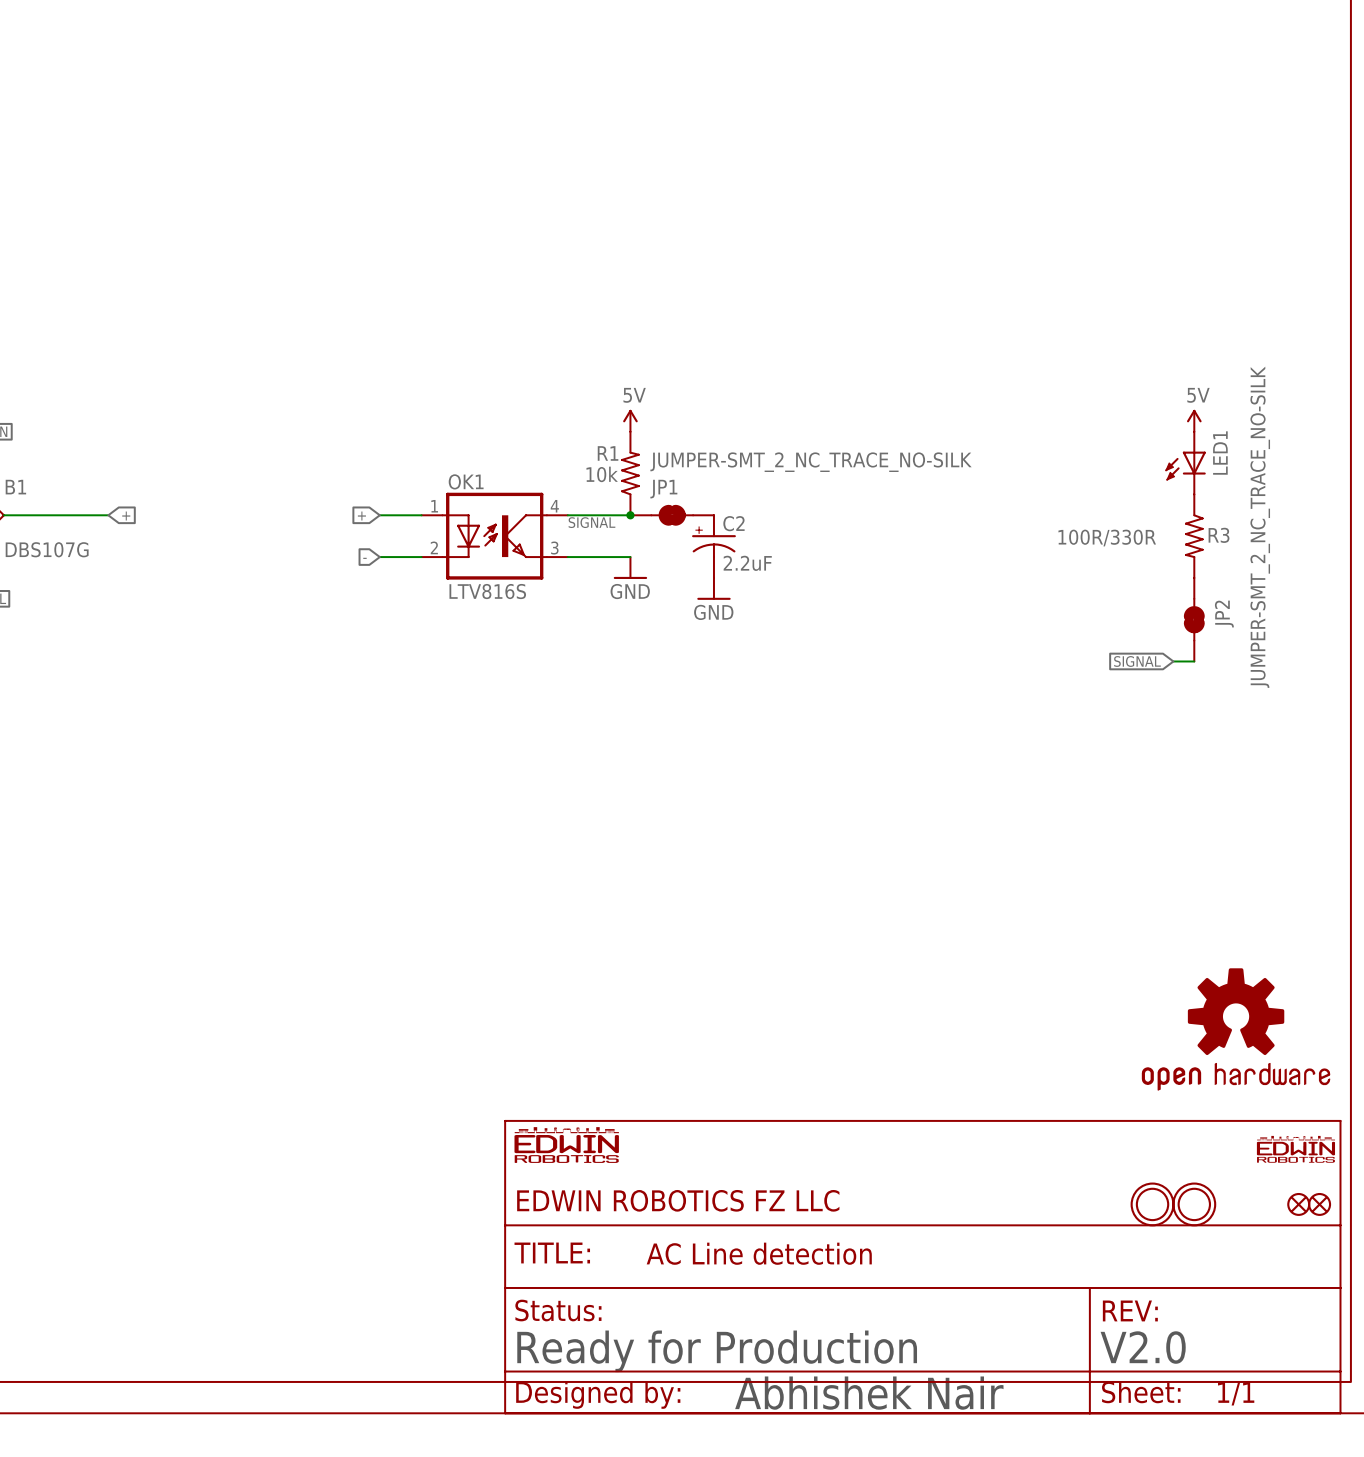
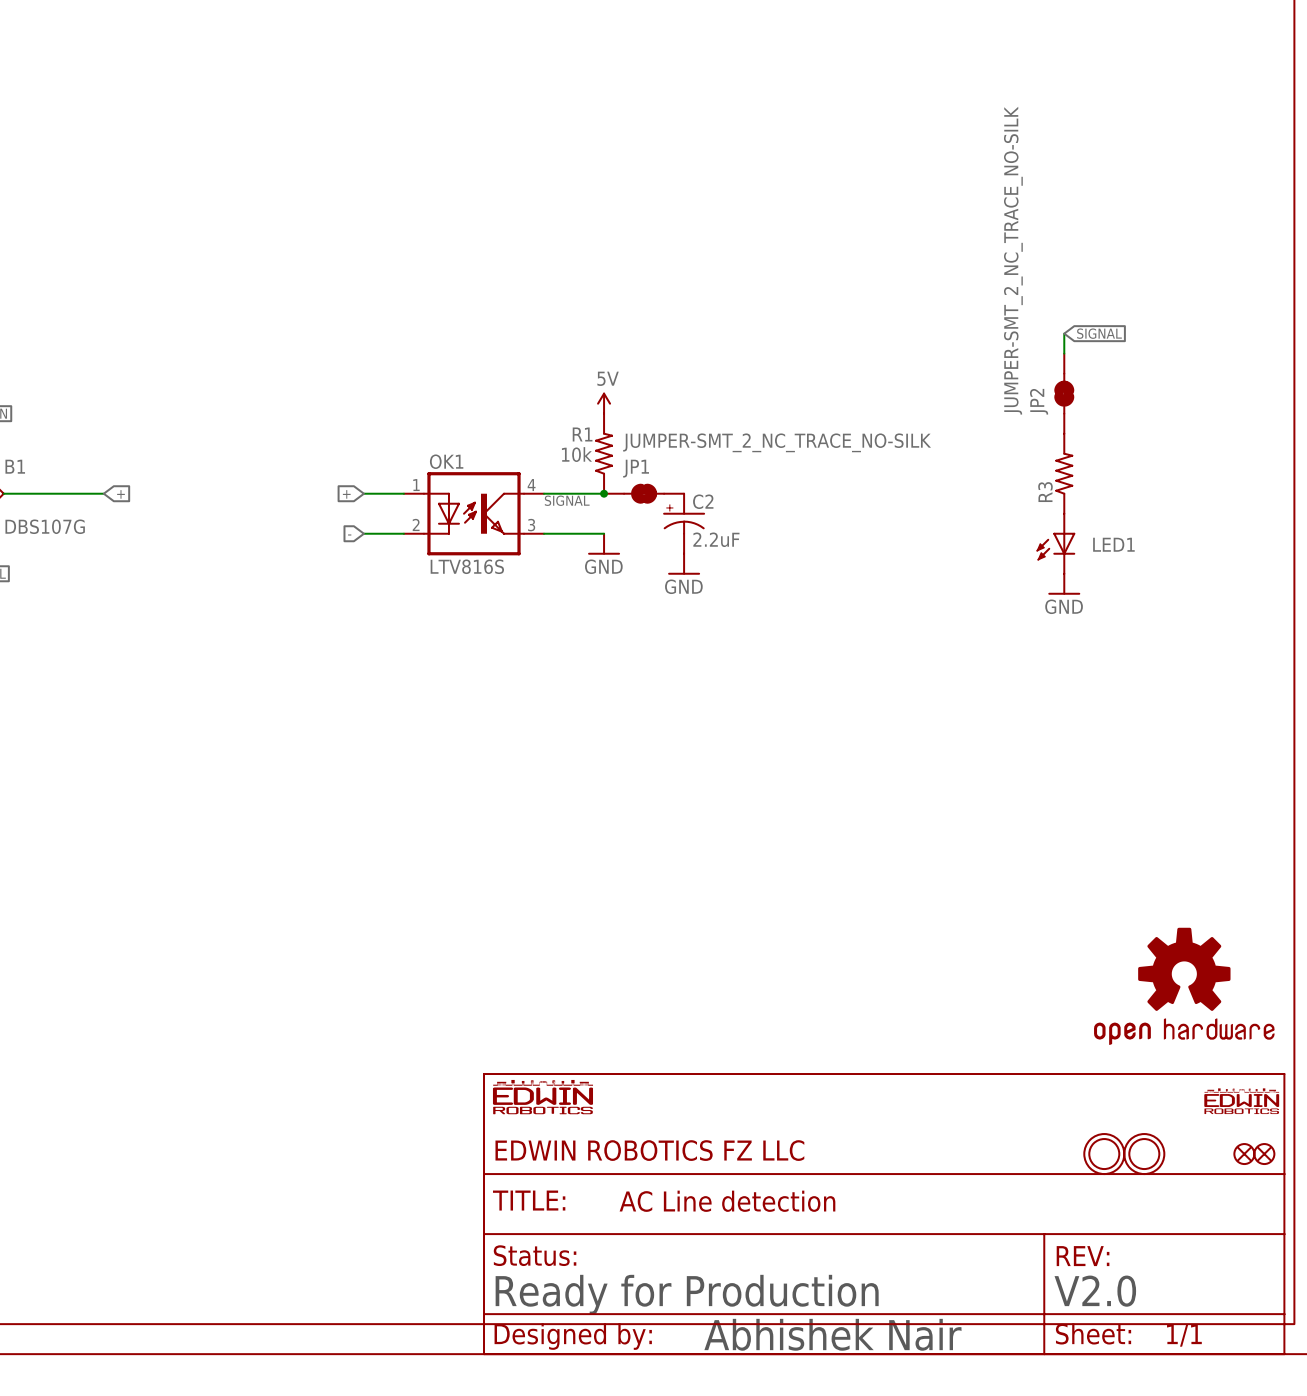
wire: none -> (1064, 333) (1064, 353)
global label: none -> SIGNAL (1099, 333)
power symbol: 5V (1194, 420) -> none
LED1 name rotation: 0° (1220, 453) -> 90° clockwise (1113, 544)
LED1 position: (1185, 463) -> (1055, 543)
JP2 value position: JUMPER-SMT_2_NC_TRACE_NO-SILK (1260, 527) -> JUMPER-SMT_2_NC_TRACE_NO-SILK (1013, 260)
R3 name position: R3 (1219, 535) -> R3 (1045, 492)
R3 rotation: 0° (1194, 536) -> 180° (1064, 473)
R3 position: (1194, 536) -> (1064, 473)
R3 value: 100R/330R (1107, 538) -> none
power symbol: none -> GND (1064, 584)
JP2 rotation: 0° (1194, 619) -> 180° (1064, 393)
JP2 position: (1194, 619) -> (1064, 393)
global label: SIGNAL (1137, 661) -> none
wire: (1173, 661) (1194, 661) -> none

